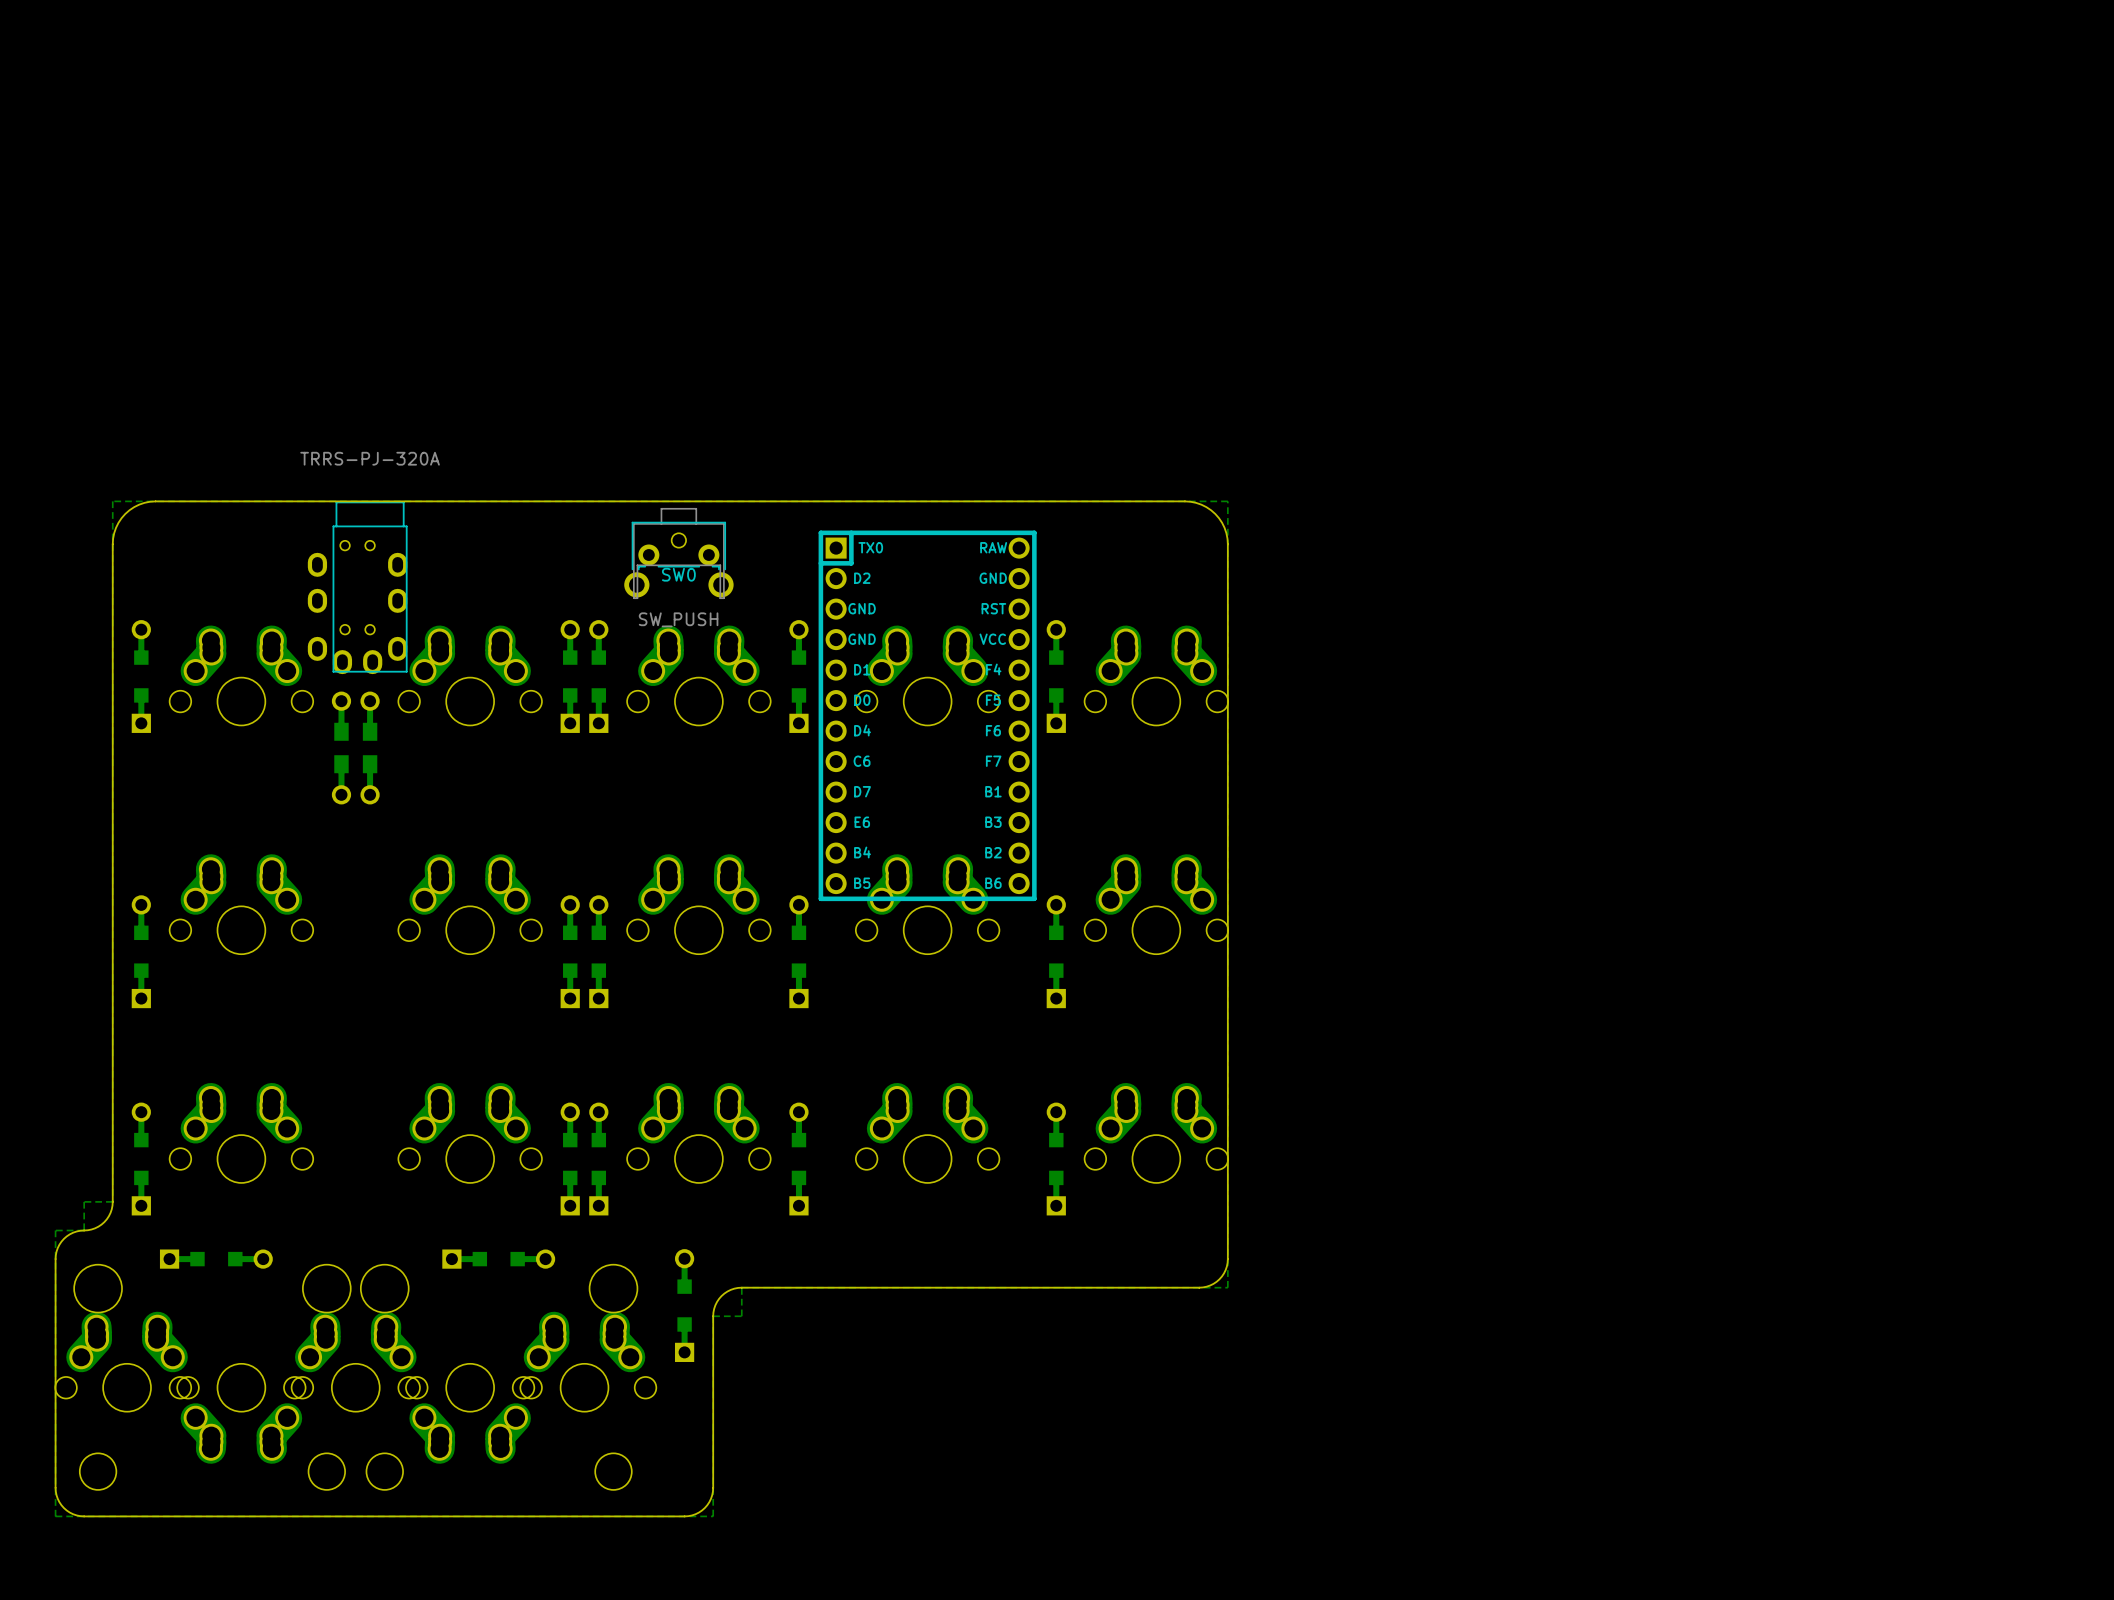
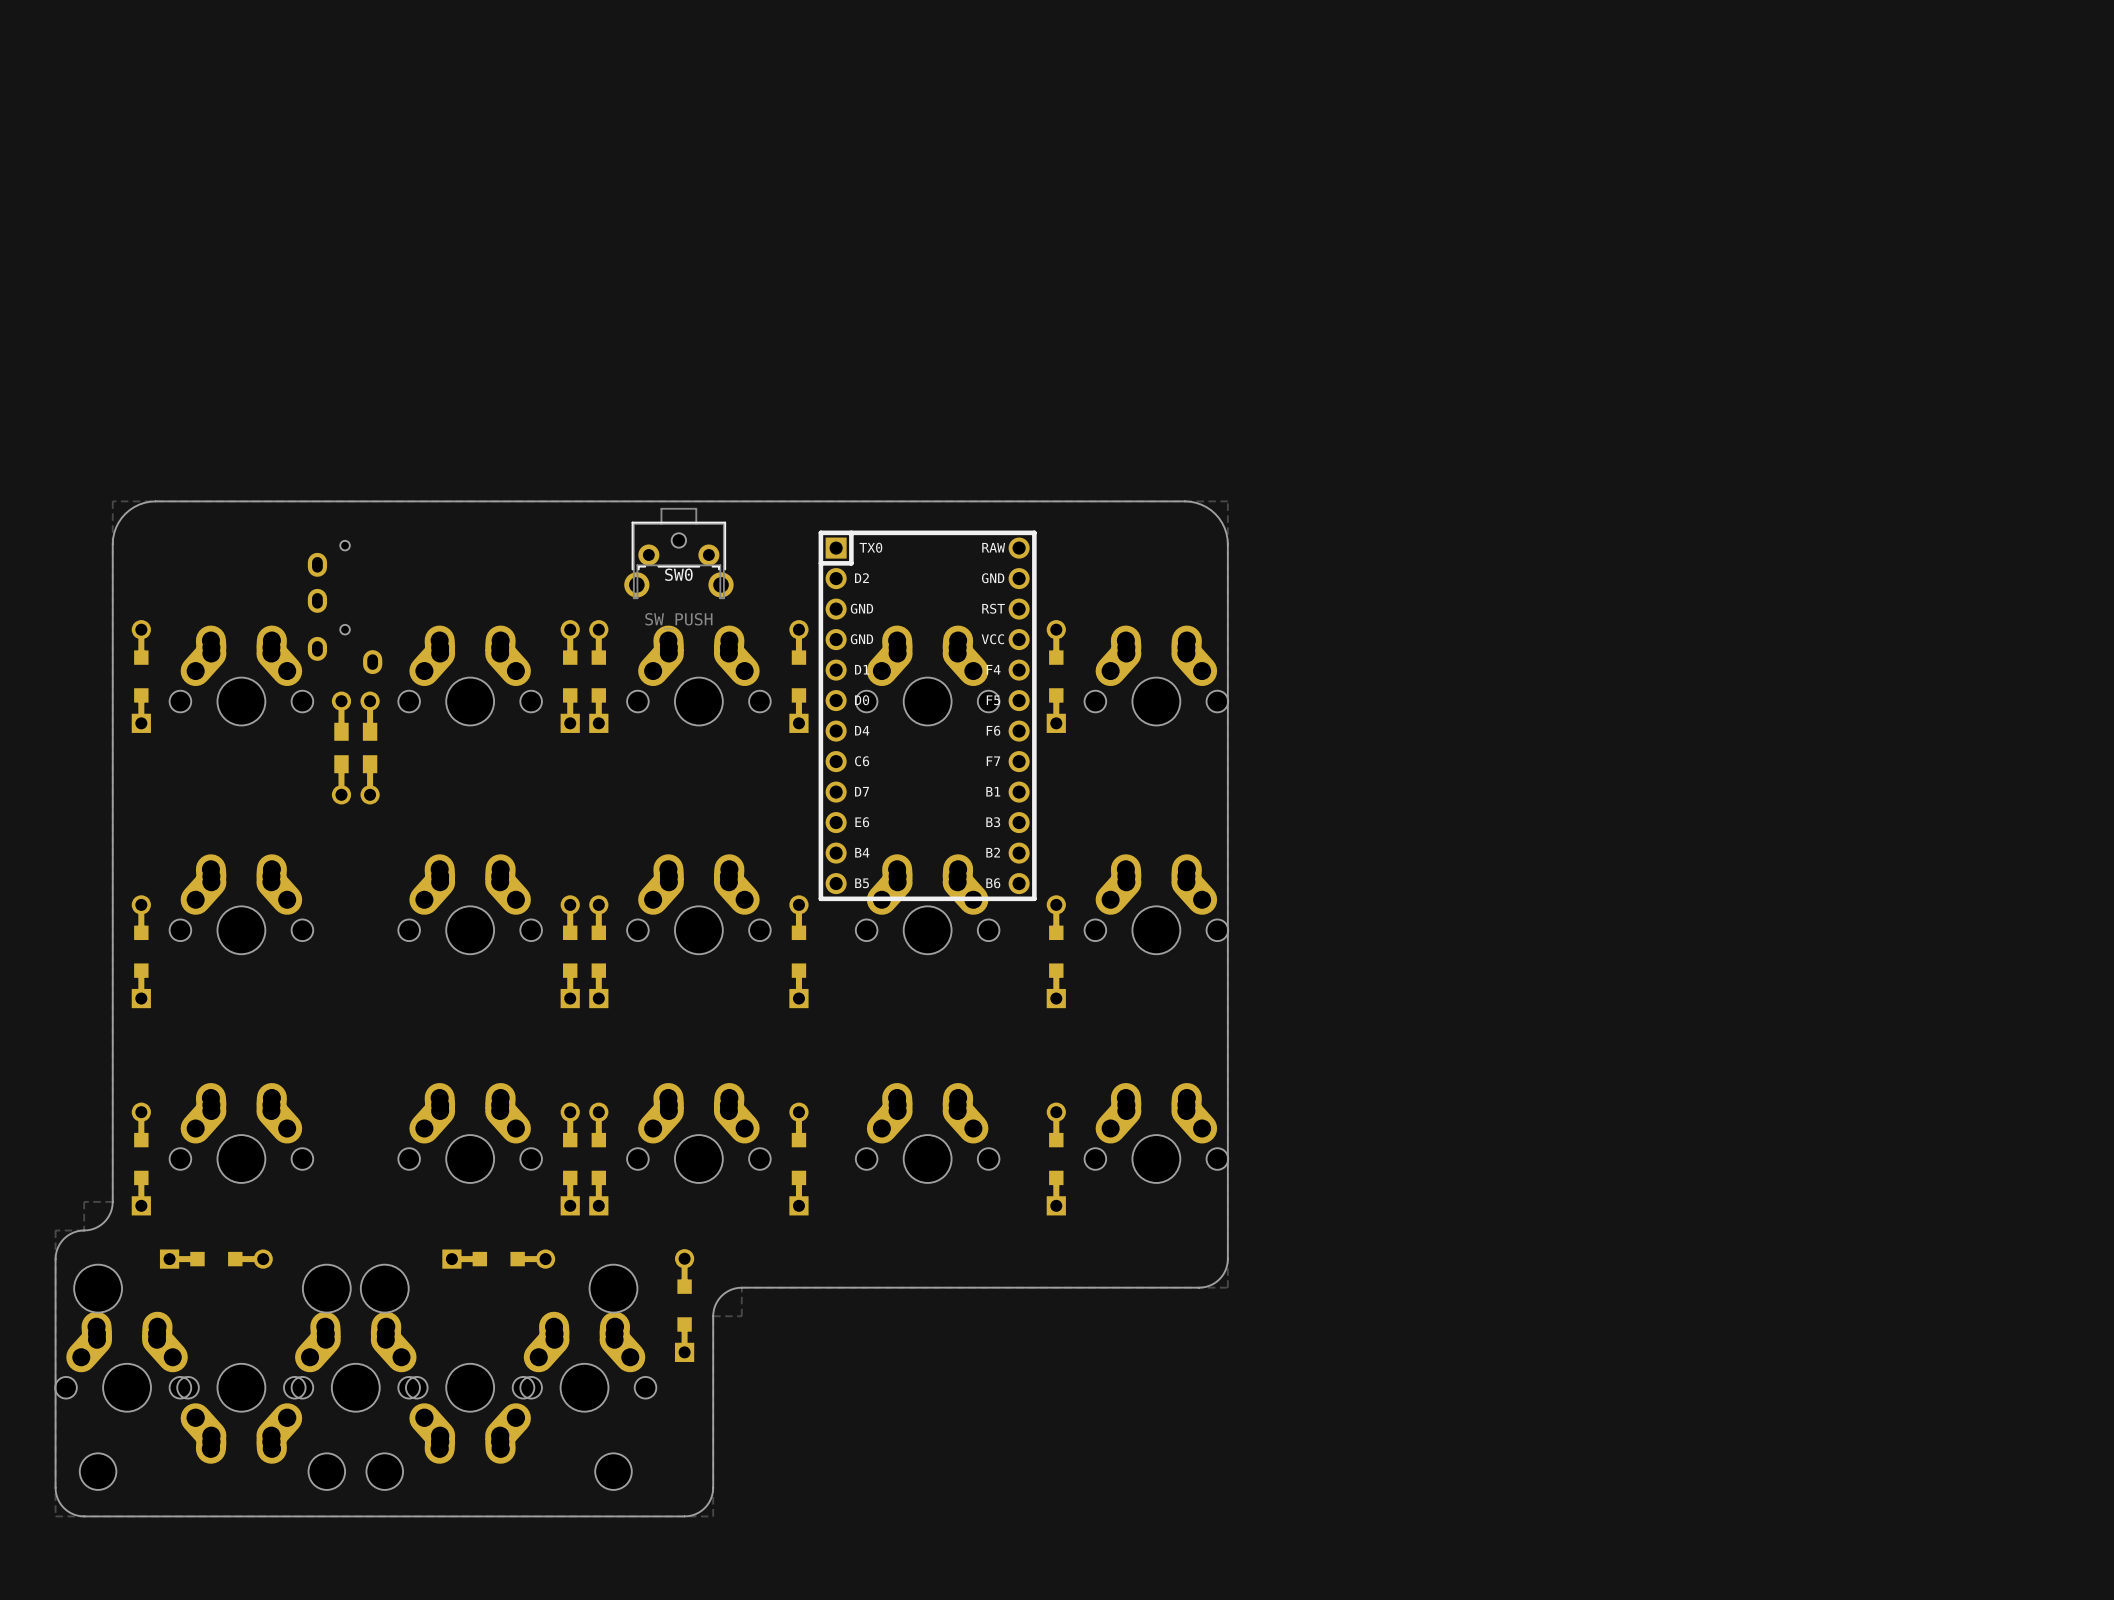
part: TRRS-PJ-320A (370, 587) -> none

